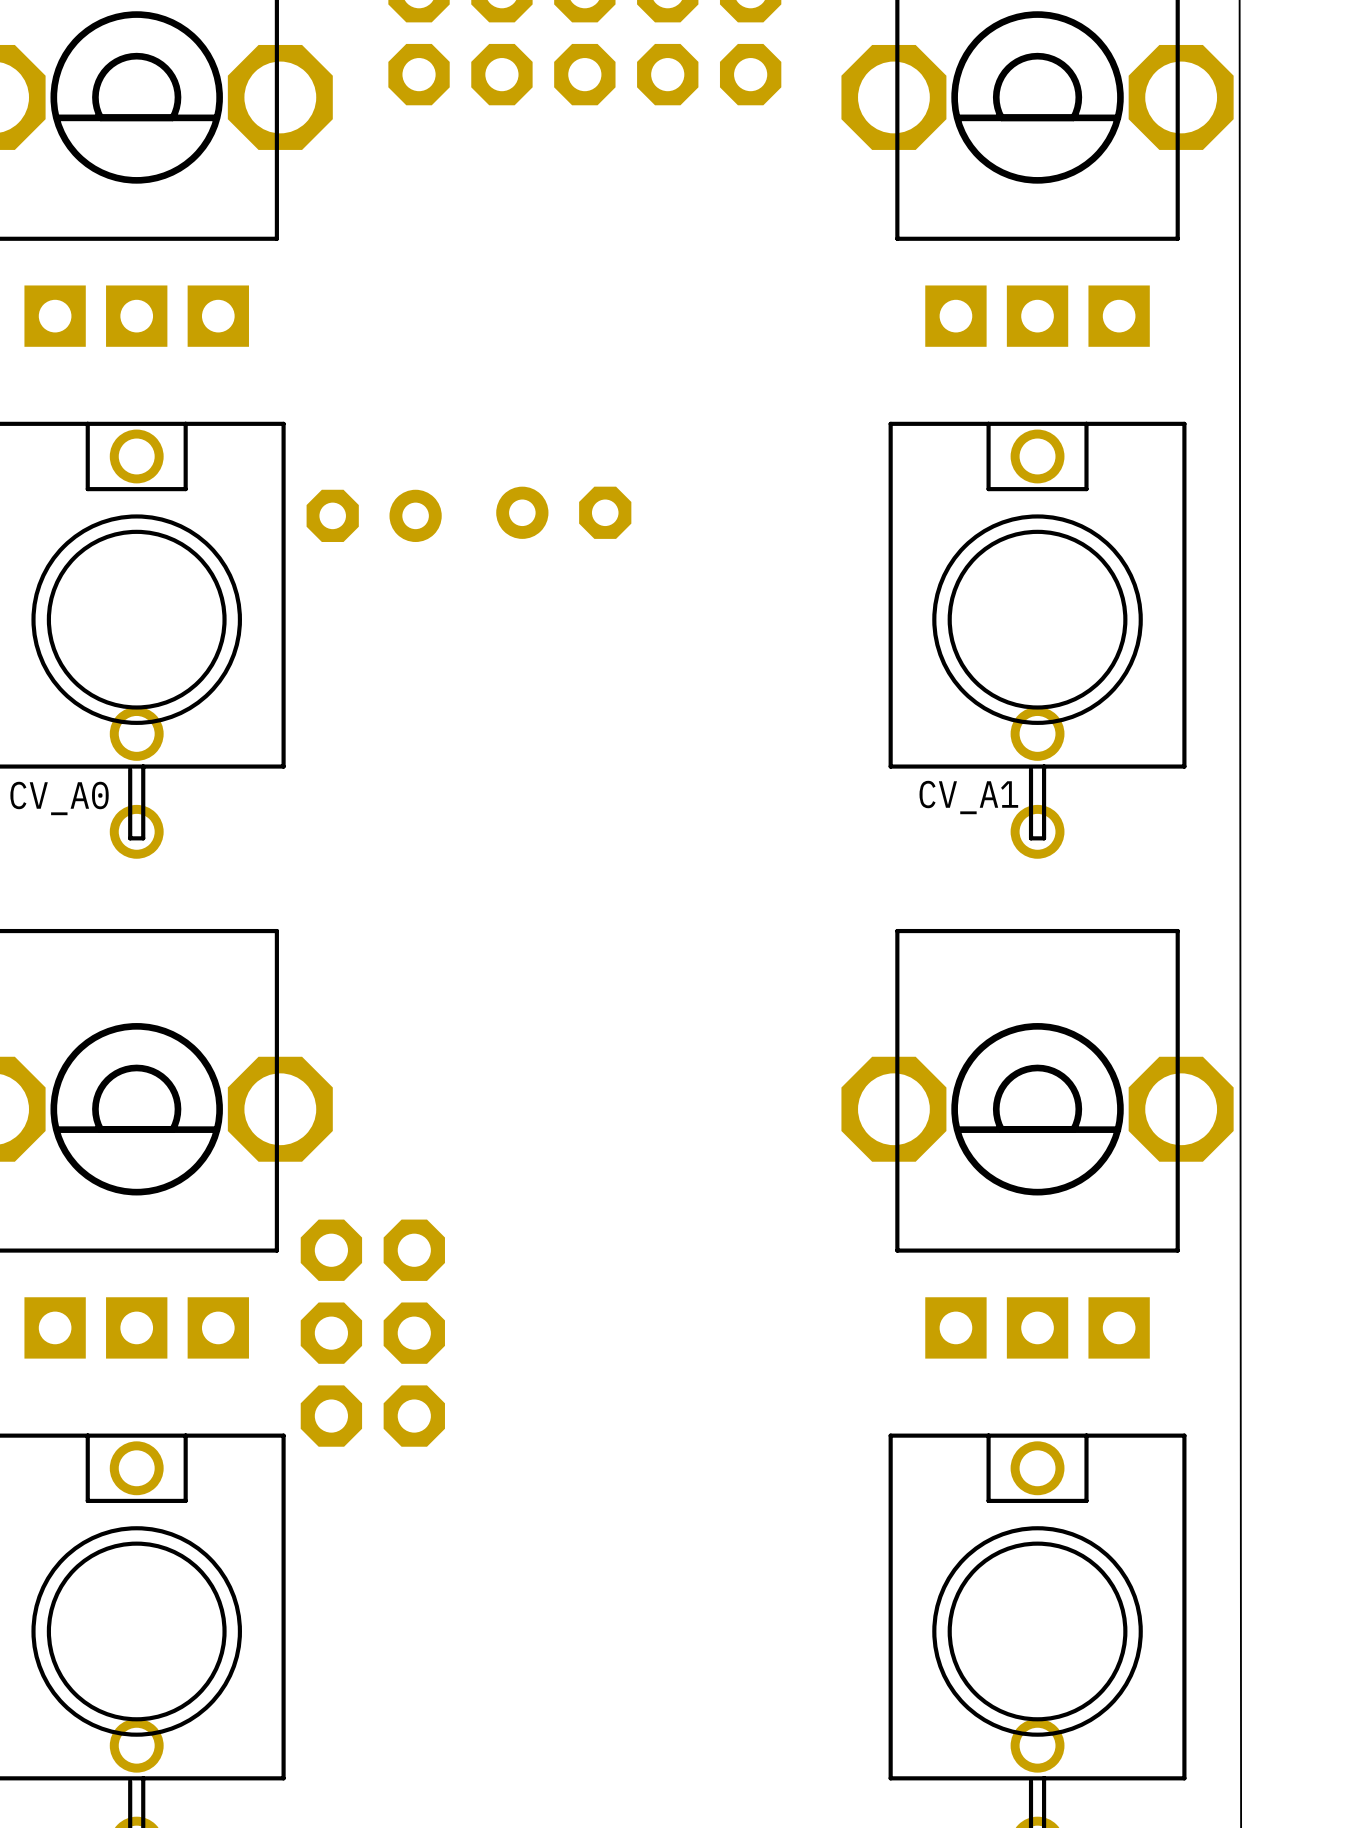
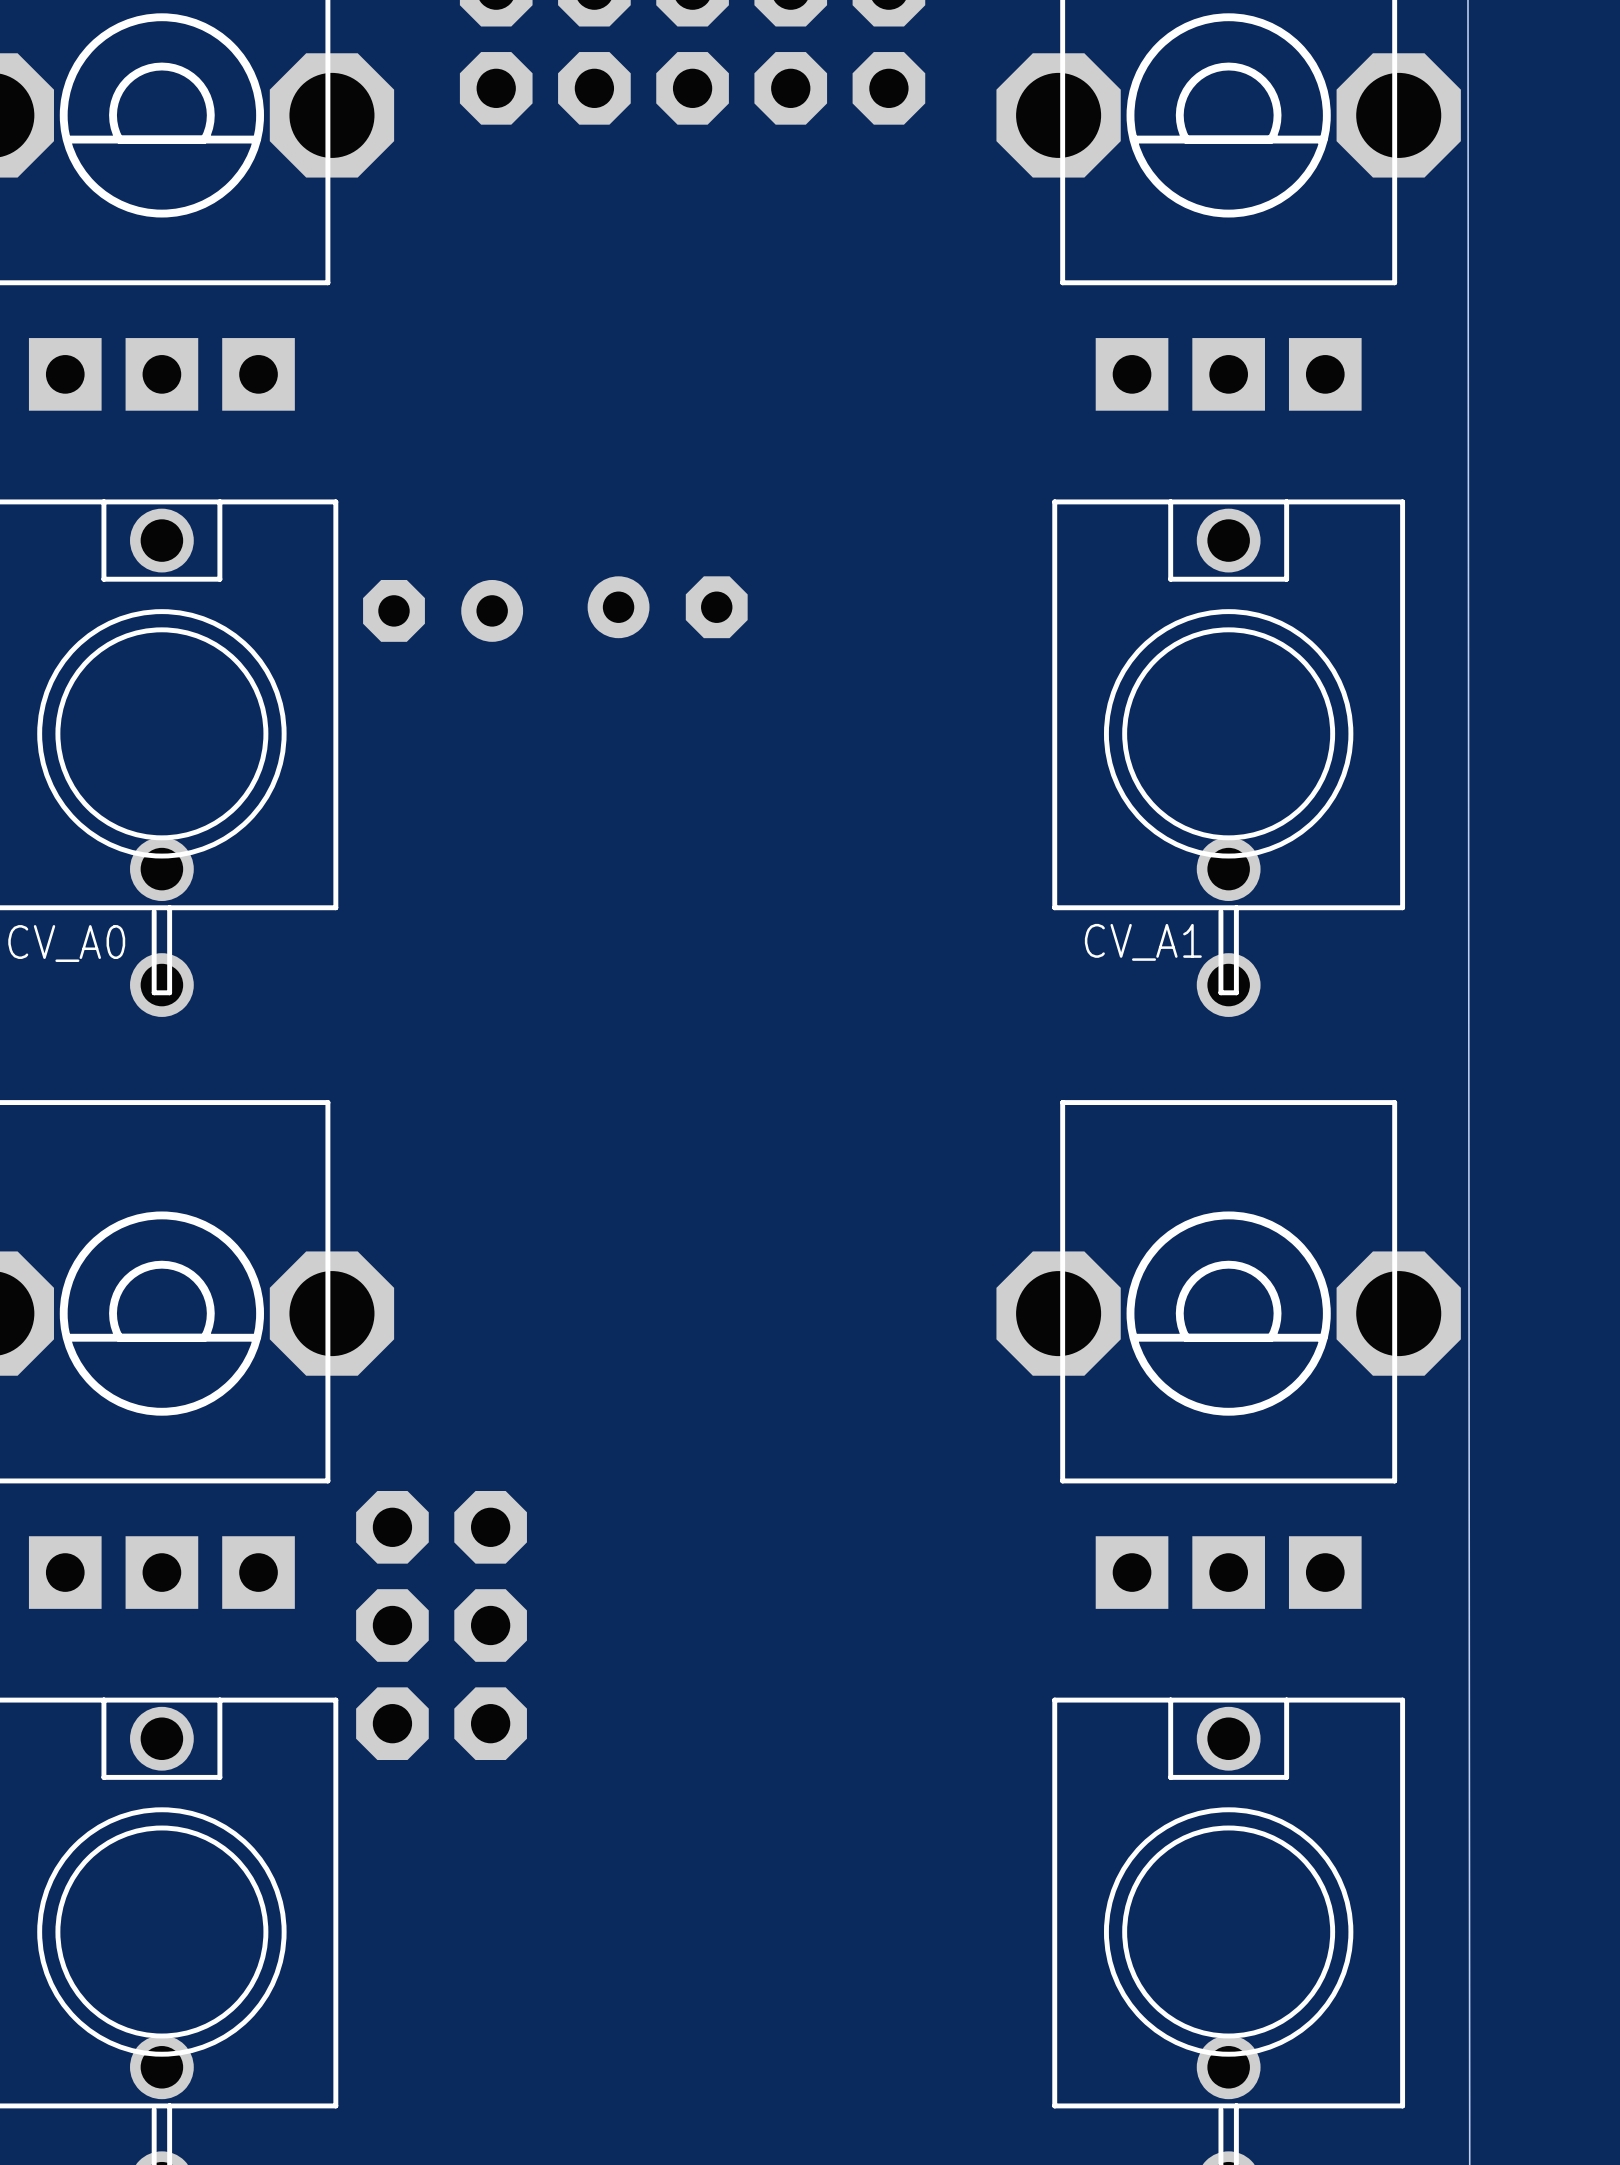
part position: (372, 1333) -> (441, 1625)

